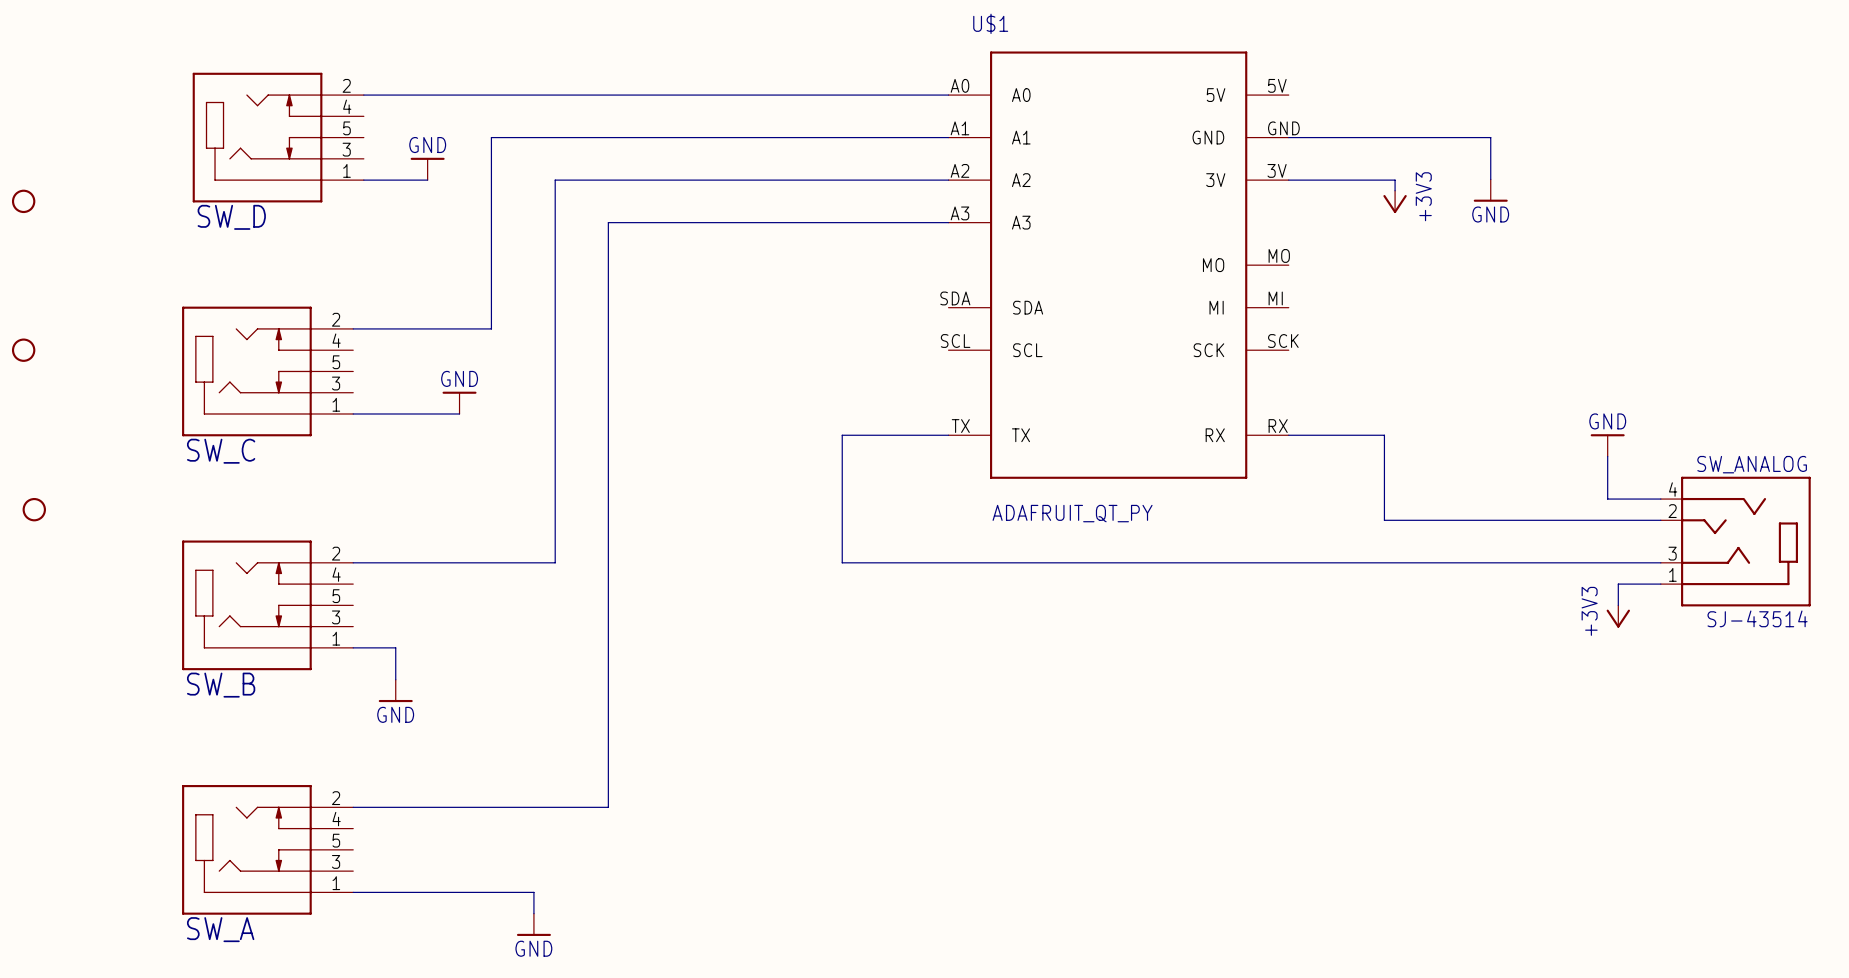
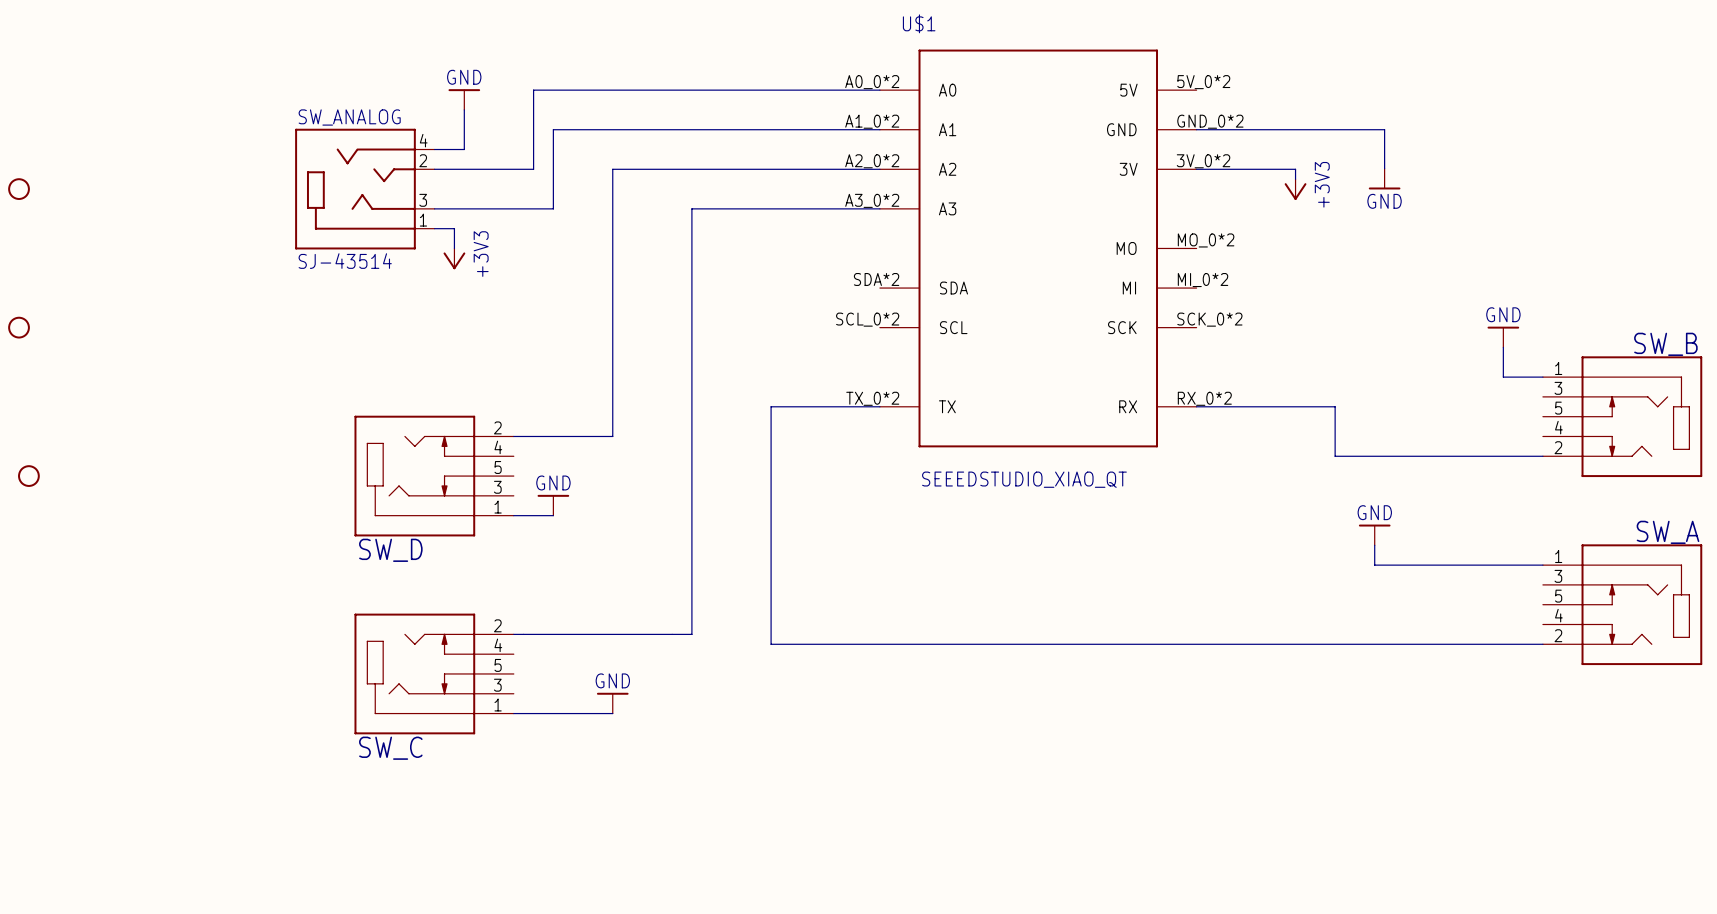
U$1 symbol: [948, 51, 1289, 479] -> [879, 49, 1197, 448]
wire: (363, 95) (576, 95) -> none
wire: none -> (464, 109) (464, 149) (434, 149)
SW_D: (278, 137) -> none
wire: (597, 137) (491, 137) (491, 243) -> (553, 129) (553, 208) (434, 208)
power symbol text position: GND (427, 145) -> GND (464, 77)
power symbol position: GND (427, 168) -> GND (464, 99)
wire: (363, 180) (427, 180) -> none
wire: (555, 180) (555, 562) (353, 562) -> (513, 169) (434, 169)
wire: (576, 180) (661, 180) -> (533, 169) (533, 90)
wire: none -> (612, 169) (612, 436) (513, 436)
SW_ANALOG: none -> SJ-43514 (364, 189)
wire: (746, 222) (608, 222) (608, 807) (353, 807) -> (691, 208) (691, 634) (513, 634)
wire: none -> (434, 228) (454, 228)
wire: (491, 265) (491, 328) (353, 328) -> none
power symbol: none -> +3V3 (454, 258)
SW_C: (267, 371) -> none
wire: none -> (1503, 347) (1503, 377) (1542, 377)
power symbol: GND (459, 402) -> none
wire: (353, 413) (459, 413) -> none
wire: (842, 435) (842, 562) (1660, 562) -> (780, 406) (771, 406) (771, 644) (1542, 644)
wire: (1384, 435) (1384, 520) (1660, 520) -> (1285, 406) (1335, 406) (1335, 456) (1542, 456)
power symbol position: GND (1607, 445) -> GND (1503, 337)
SW_B: none -> (1622, 416)
wire: (1607, 456) (1607, 499) (1660, 499) -> none
SW_D: none -> (434, 476)
U$1 value: ADAFRUIT_QT_PY (1072, 513) -> SEEEDSTUDIO_XIAO_QT (1024, 479)
power symbol: none -> GND (553, 505)
SW_ANALOG: SJ-43514 (1735, 541) -> none
wire: none -> (513, 515) (553, 515)
power symbol: none -> GND (1374, 534)
wire: none -> (1374, 545) (1374, 565) (1542, 565)
wire: (1660, 584) (1618, 584) (1618, 605) -> none
SW_B: (267, 605) -> none
power symbol: +3V3 (1618, 616) -> none
wire: (353, 647) (395, 647) (395, 679) -> none
SW_A: none -> (1622, 604)
power symbol: GND (395, 690) -> none
SW_C: none -> (434, 673)
power symbol: none -> GND (612, 703)
wire: none -> (513, 713) (612, 713)
SW_A: (267, 849) -> none
wire: (353, 892) (533, 892) (533, 913) -> none
power symbol: GND (533, 924) -> none

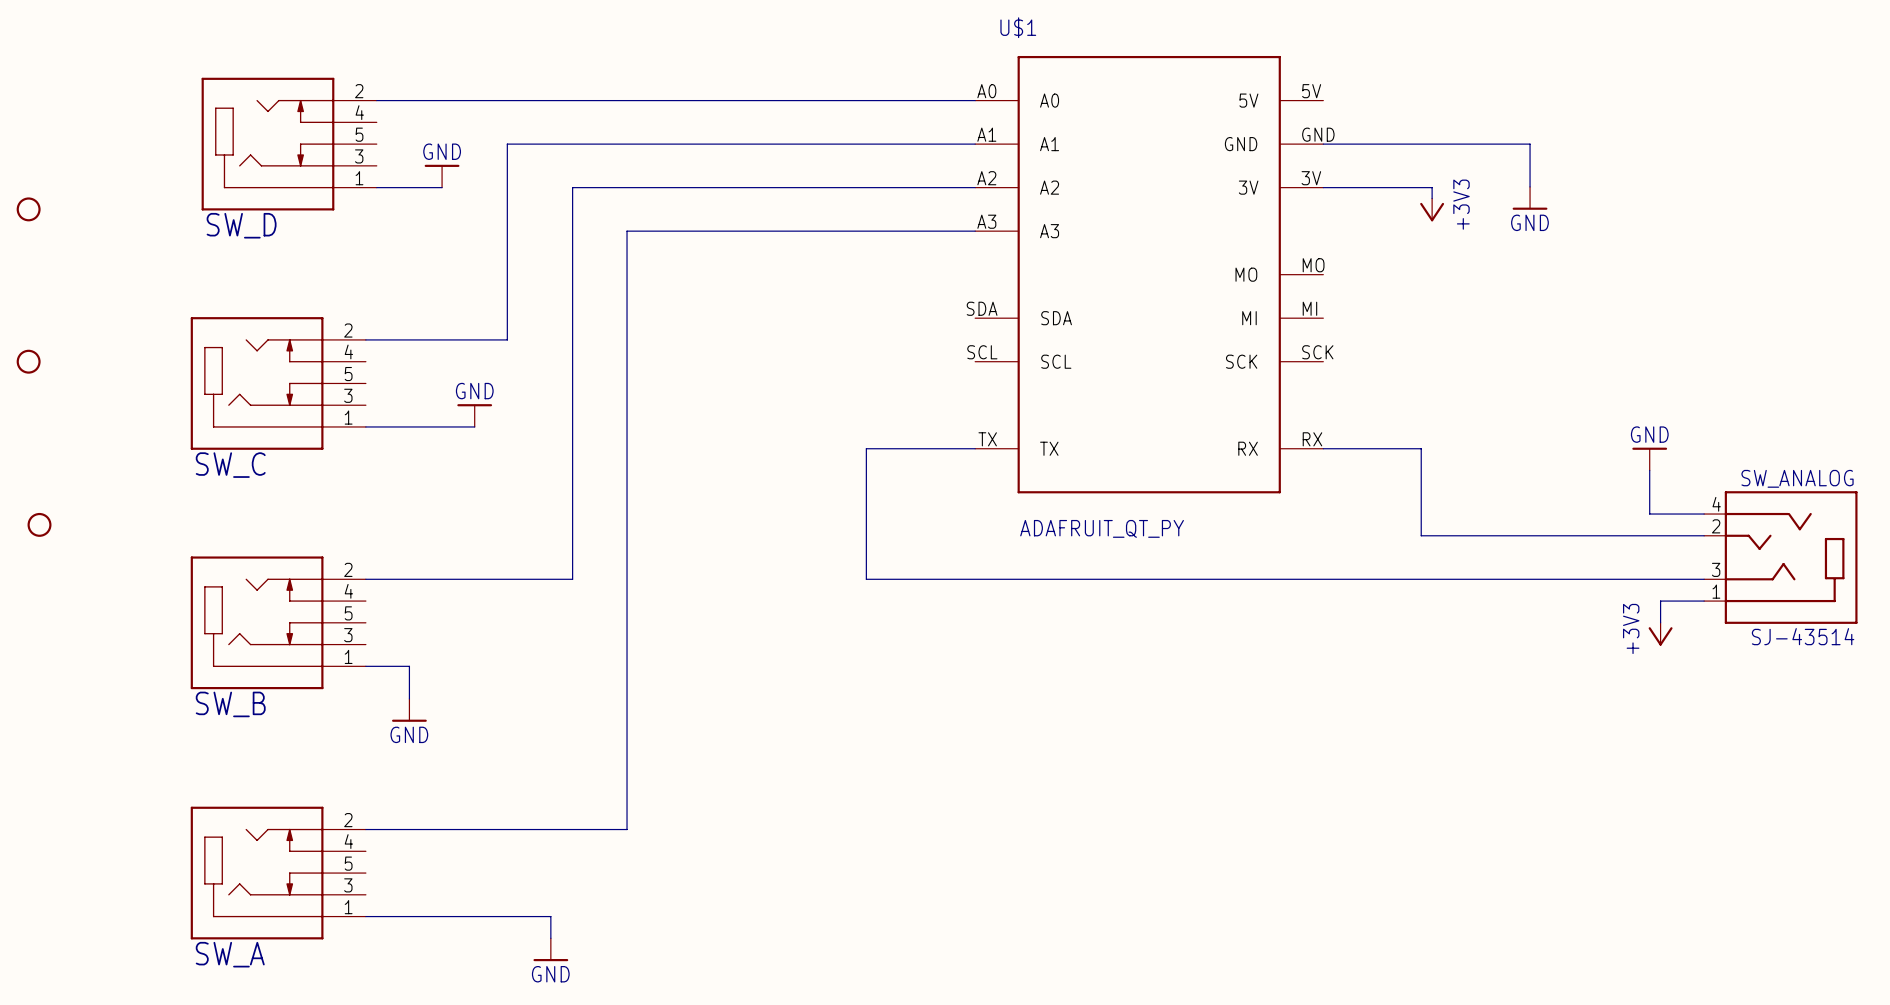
U$1 symbol: [879, 49, 1197, 448] -> [975, 55, 1324, 494]
power symbol text position: GND (464, 77) -> GND (442, 151)
wire: none -> (376, 100) (594, 100)
wire: (533, 90) (533, 169) -> (681, 187) (594, 187)
power symbol position: GND (464, 99) -> GND (442, 176)
wire: (464, 109) (464, 149) (434, 149) -> none
SW_D: none -> (289, 144)
wire: (553, 129) (553, 208) (434, 208) -> (616, 144) (507, 144) (507, 252)
wire: none -> (376, 187) (442, 187)
wire: (434, 169) (513, 169) -> (365, 579) (572, 579) (572, 187)
wire: (612, 169) (612, 436) (513, 436) -> none
SW_ANALOG: SJ-43514 (364, 189) -> none
wire: (691, 208) (691, 634) (513, 634) -> (768, 231) (627, 231) (627, 829) (365, 829)
wire: (434, 228) (454, 228) -> none
wire: none -> (507, 274) (507, 339) (365, 339)
power symbol: +3V3 (454, 258) -> none
power symbol position: GND (1503, 337) -> GND (1649, 459)
SW_C: none -> (278, 383)
wire: (1503, 347) (1503, 377) (1542, 377) -> none
power symbol: none -> GND (474, 415)
wire: none -> (365, 426) (474, 426)
wire: (780, 406) (771, 406) (771, 644) (1542, 644) -> (866, 448) (866, 579) (1704, 579)
wire: (1285, 406) (1335, 406) (1335, 456) (1542, 456) -> (1421, 448) (1421, 535) (1704, 535)
SW_B: (1622, 416) -> none
wire: none -> (1649, 470) (1649, 514) (1704, 514)
SW_D: (434, 476) -> none
U$1 value: SEEEDSTUDIO_XIAO_QT (1024, 479) -> ADAFRUIT_QT_PY (1102, 528)
power symbol: GND (553, 505) -> none
SW_ANALOG: none -> SJ-43514 (1780, 557)
wire: (513, 515) (553, 515) -> none
power symbol: GND (1374, 534) -> none
wire: (1374, 545) (1374, 565) (1542, 565) -> none
wire: none -> (1704, 601) (1660, 601) (1660, 622)
SW_B: none -> (278, 622)
power symbol: none -> +3V3 (1660, 634)
wire: none -> (365, 666) (409, 666) (409, 698)
SW_A: (1622, 604) -> none
power symbol: none -> GND (409, 710)
SW_C: (434, 673) -> none
power symbol: GND (612, 703) -> none
wire: (513, 713) (612, 713) -> none
SW_A: none -> (278, 873)
wire: none -> (365, 916) (550, 916) (550, 938)
power symbol: none -> GND (550, 949)

